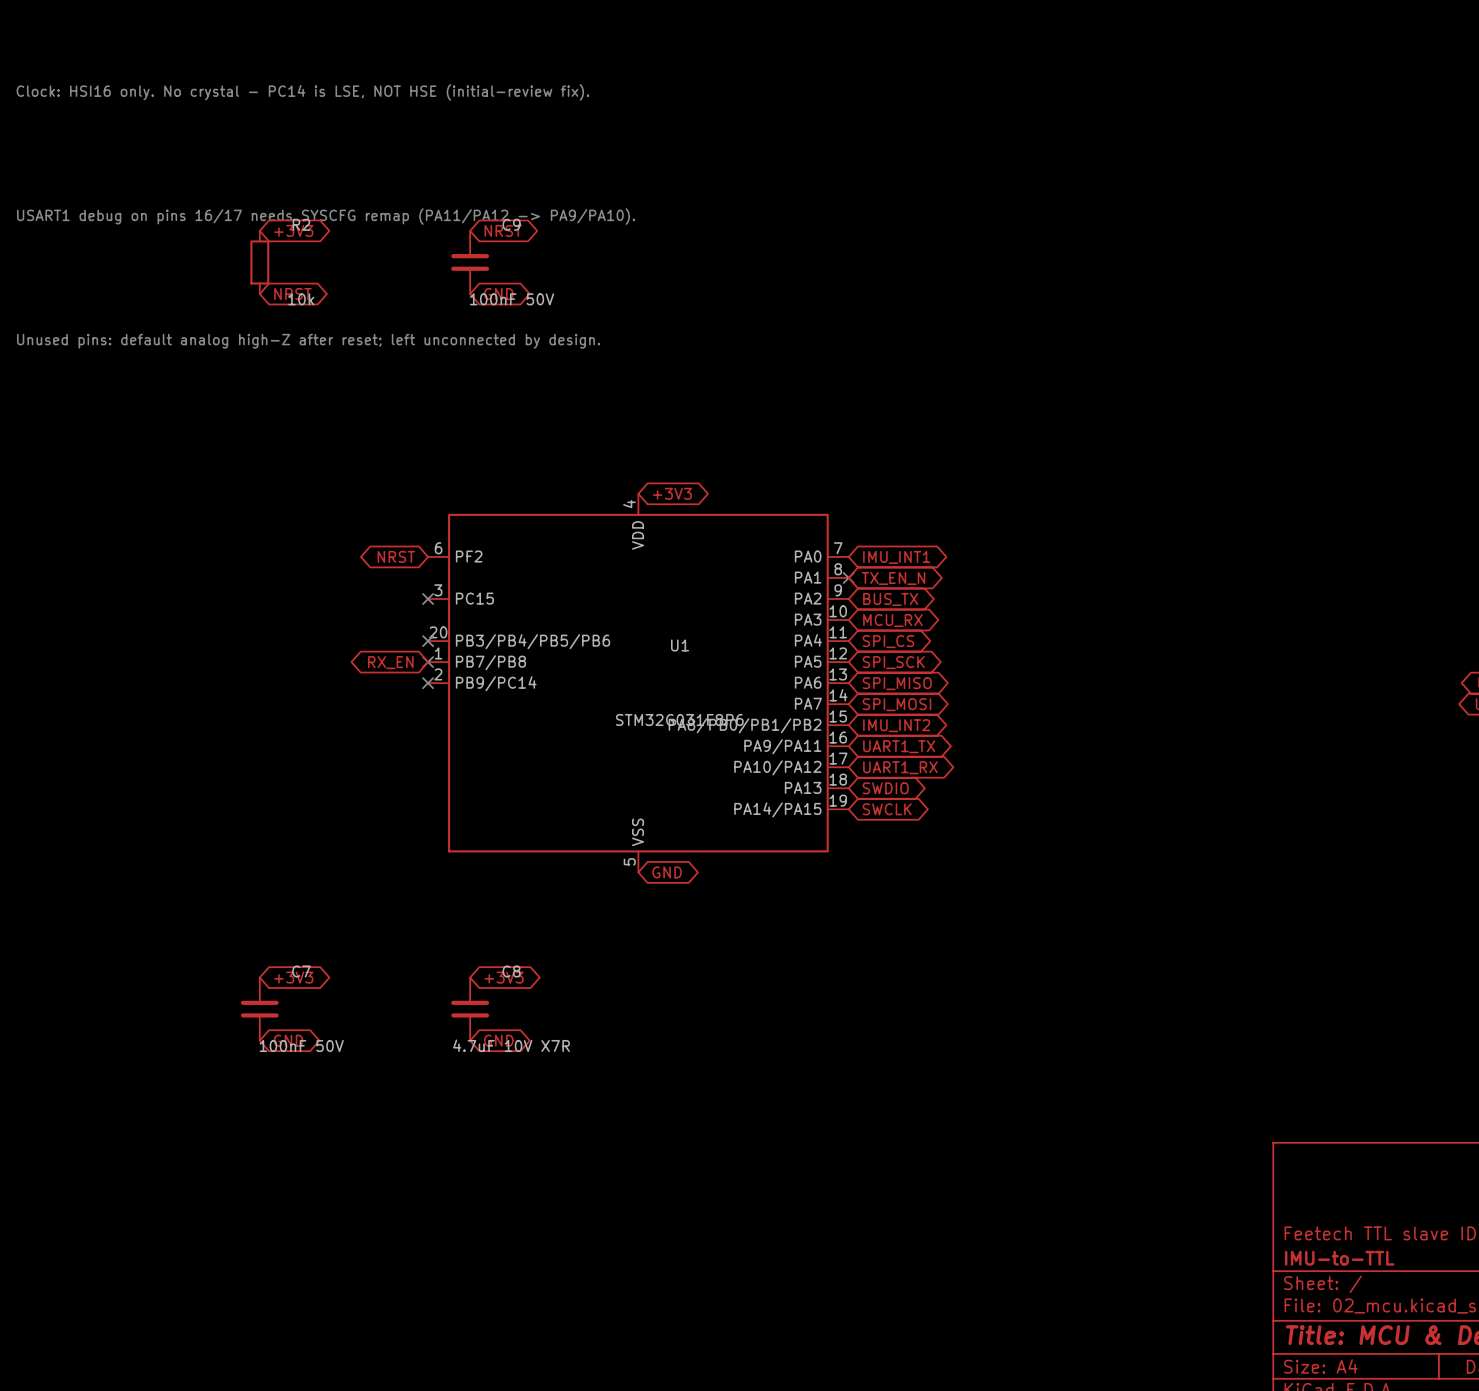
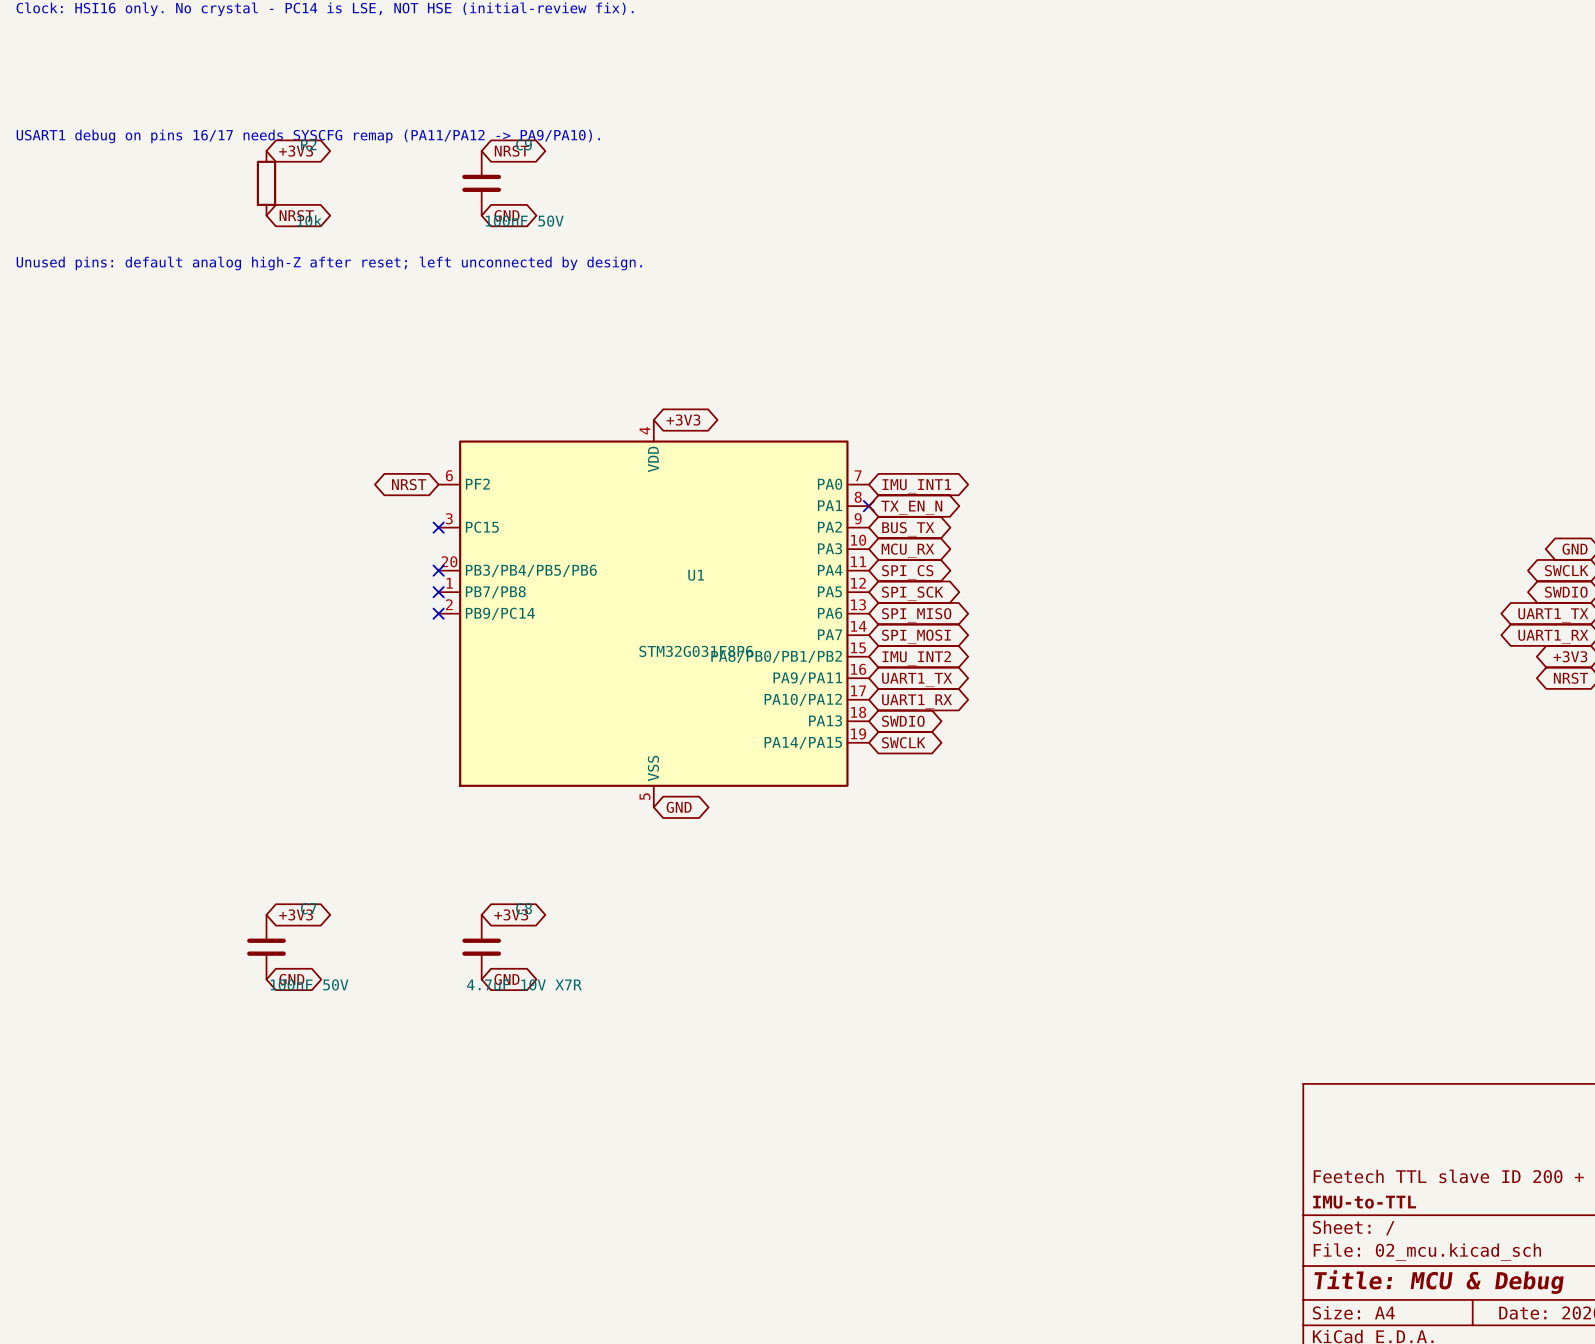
global label: RX_EN (390, 662) -> none

